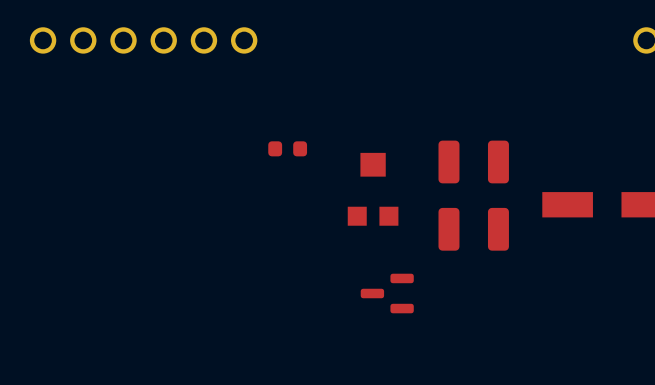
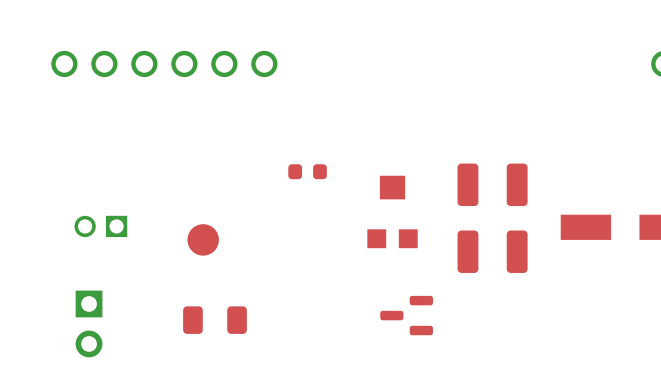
part: none -> (100, 226)
part: none -> (203, 239)
part: none -> (215, 320)
part: none -> (89, 323)

